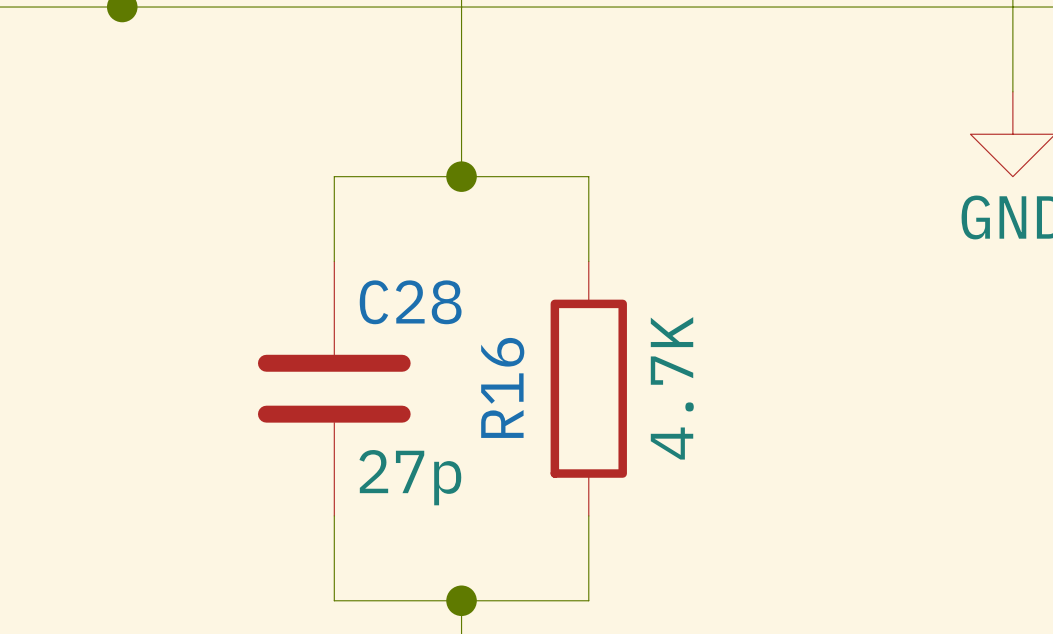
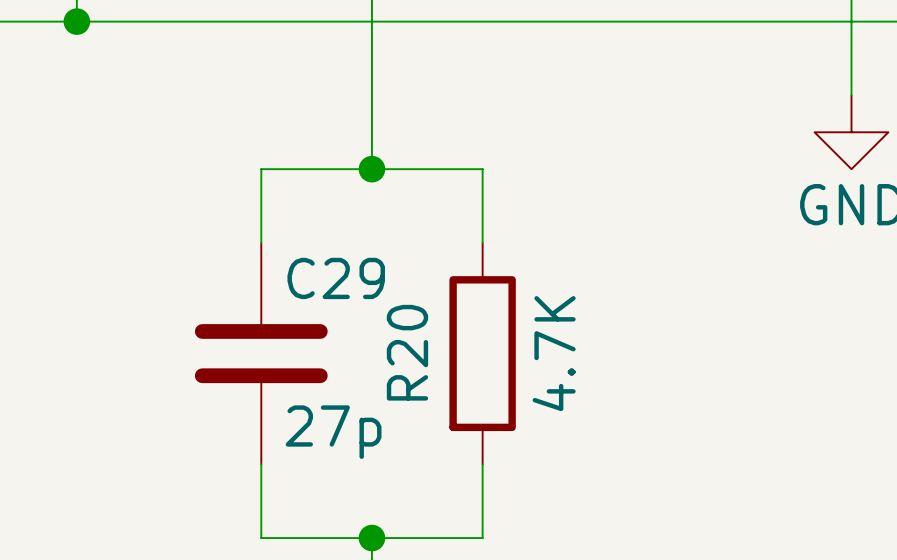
C28 name: C28 (410, 302) -> C29 (336, 278)
R16 name: R16 (502, 387) -> R20 (407, 352)

